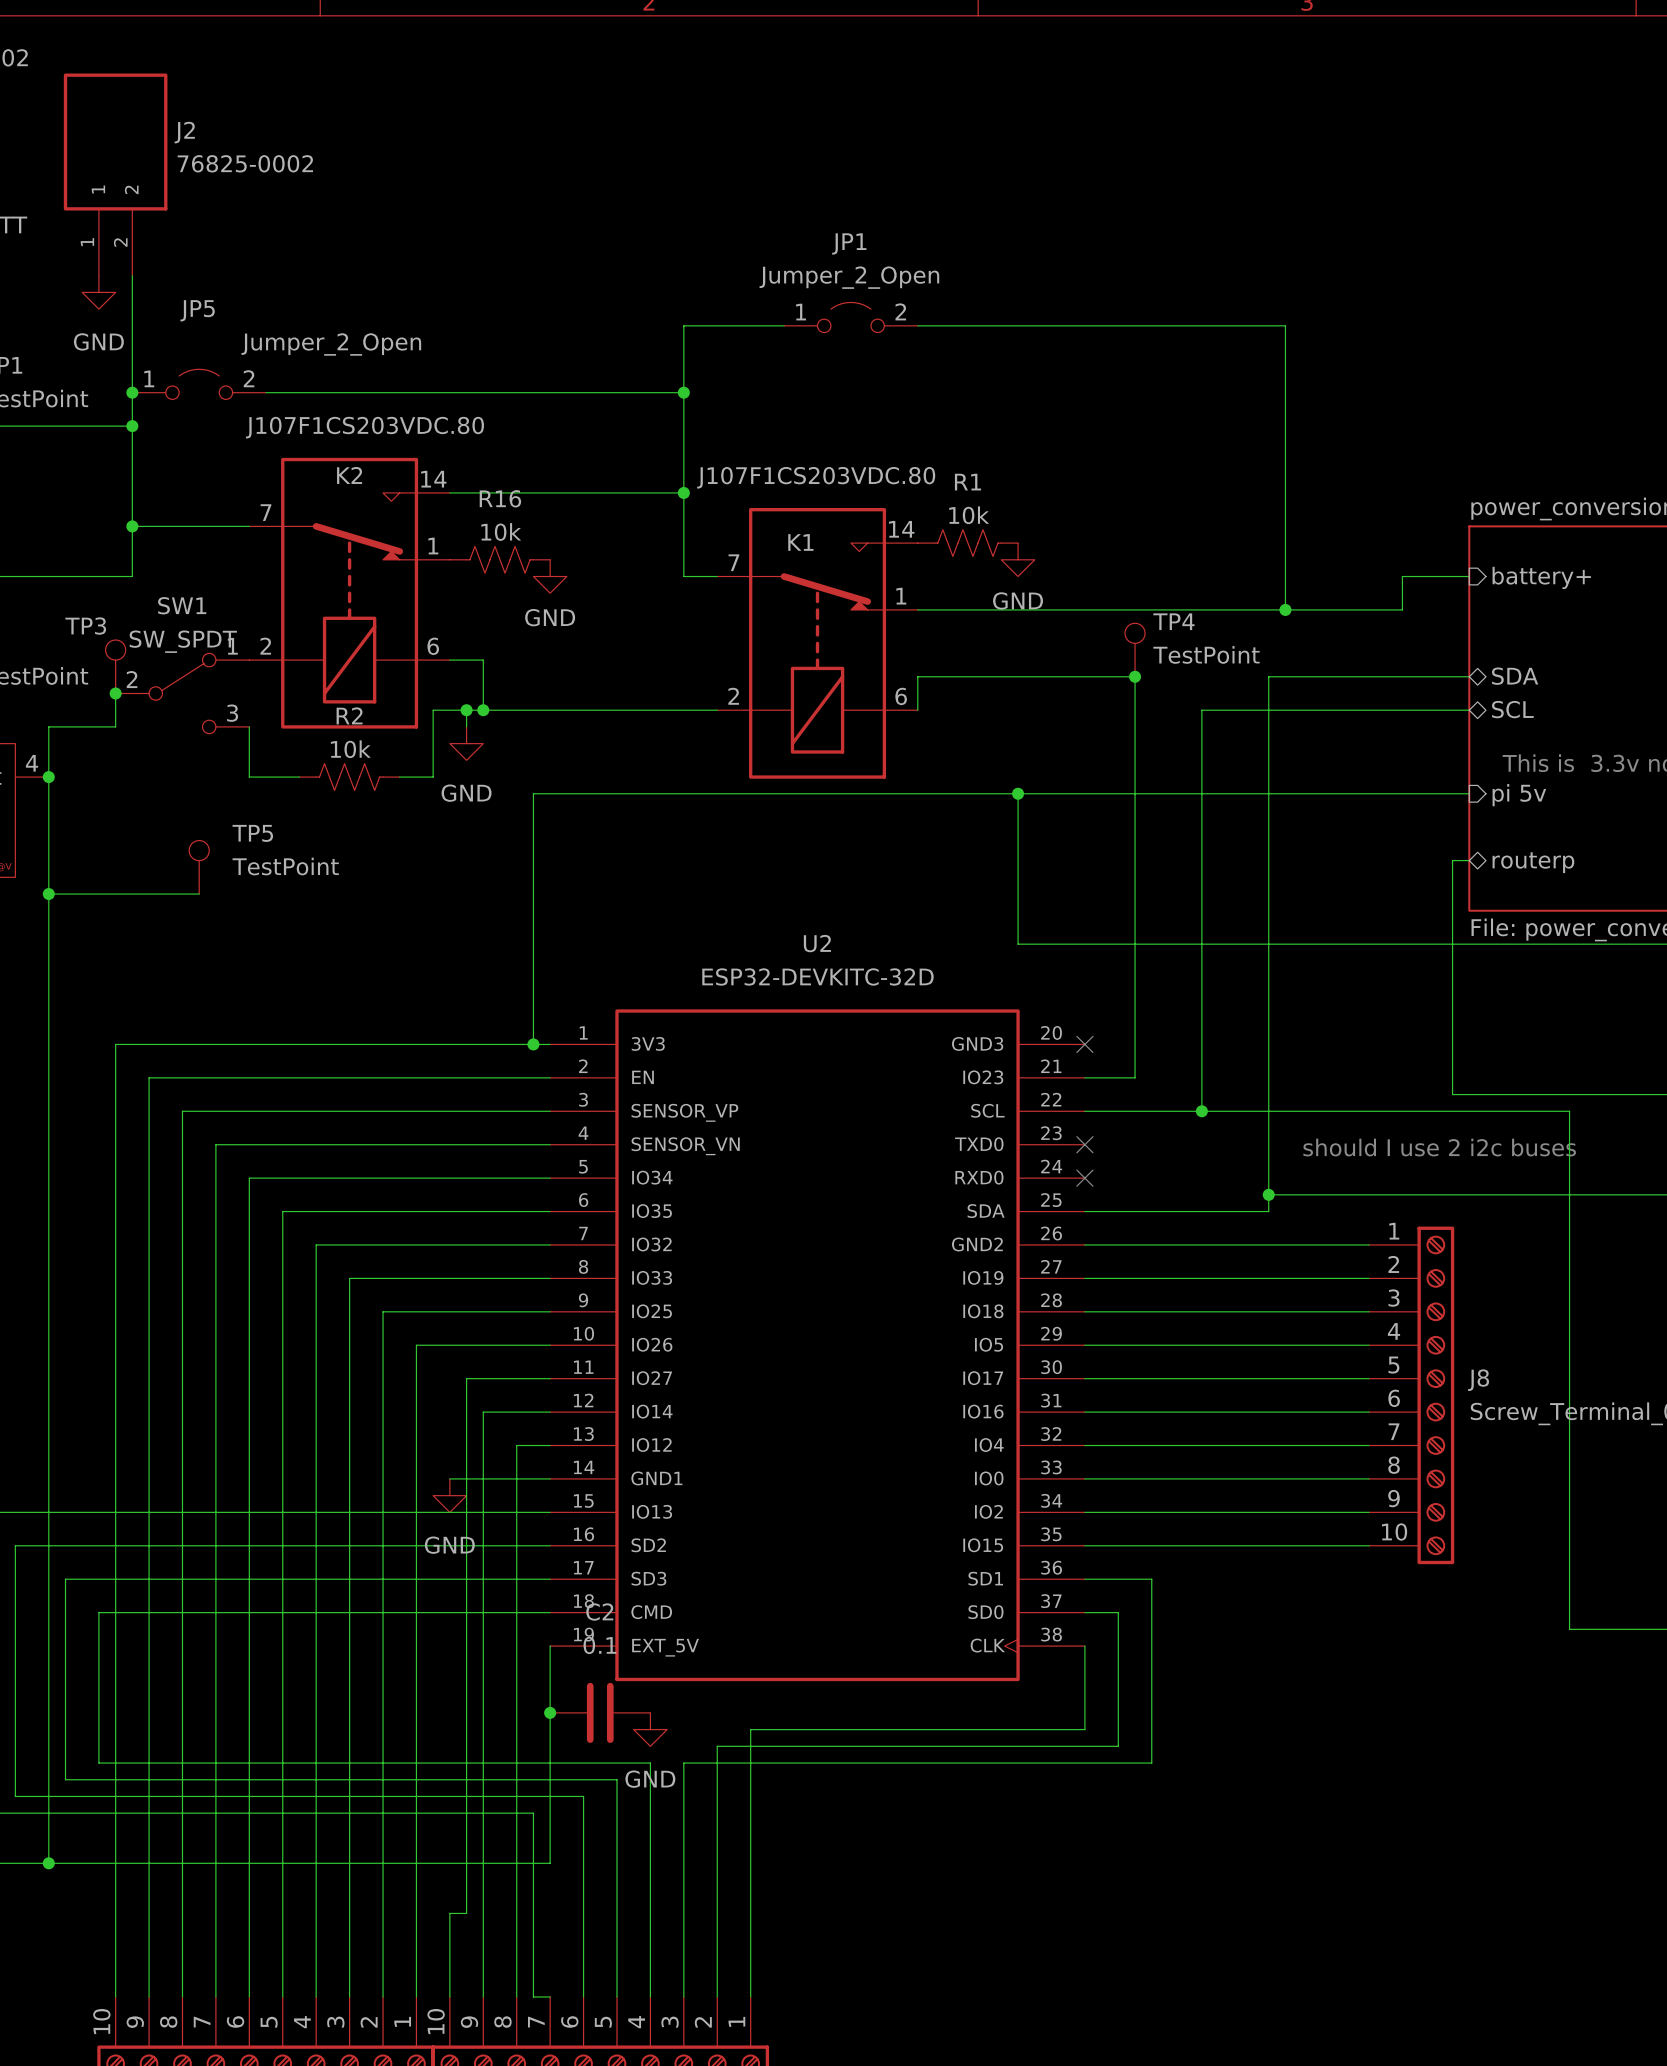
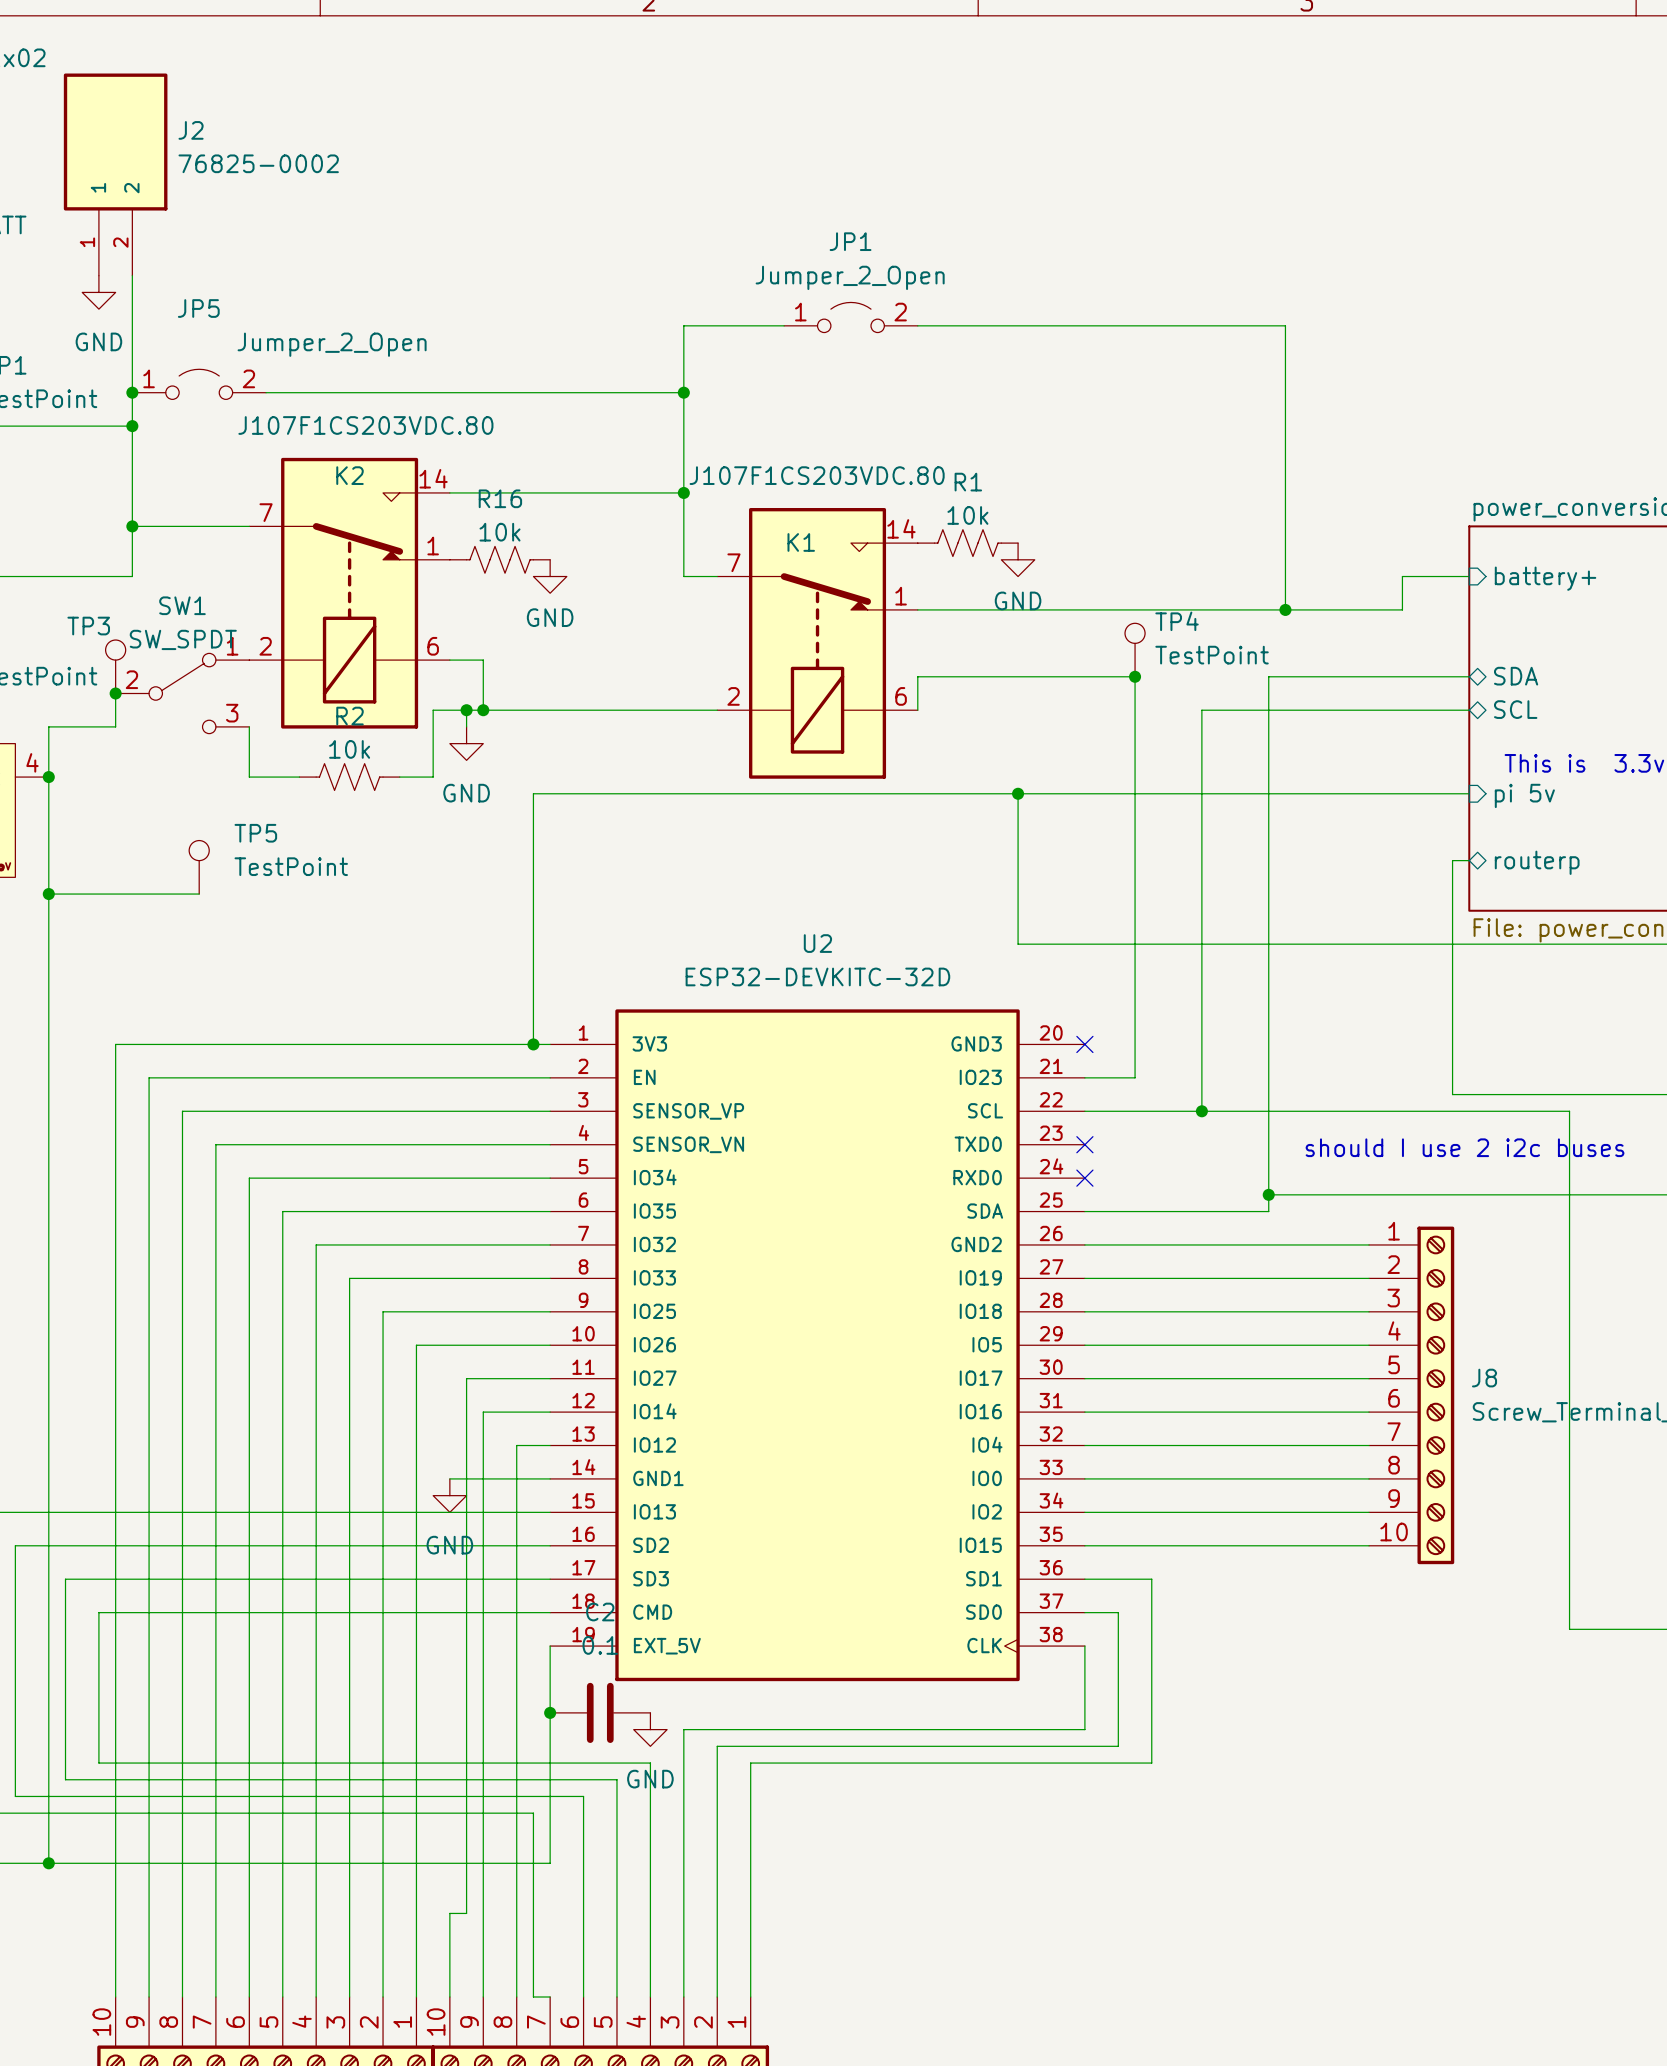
wire: (750, 1729) (750, 1763) (683, 1763) -> (750, 1729) (683, 1729) (683, 1763)

